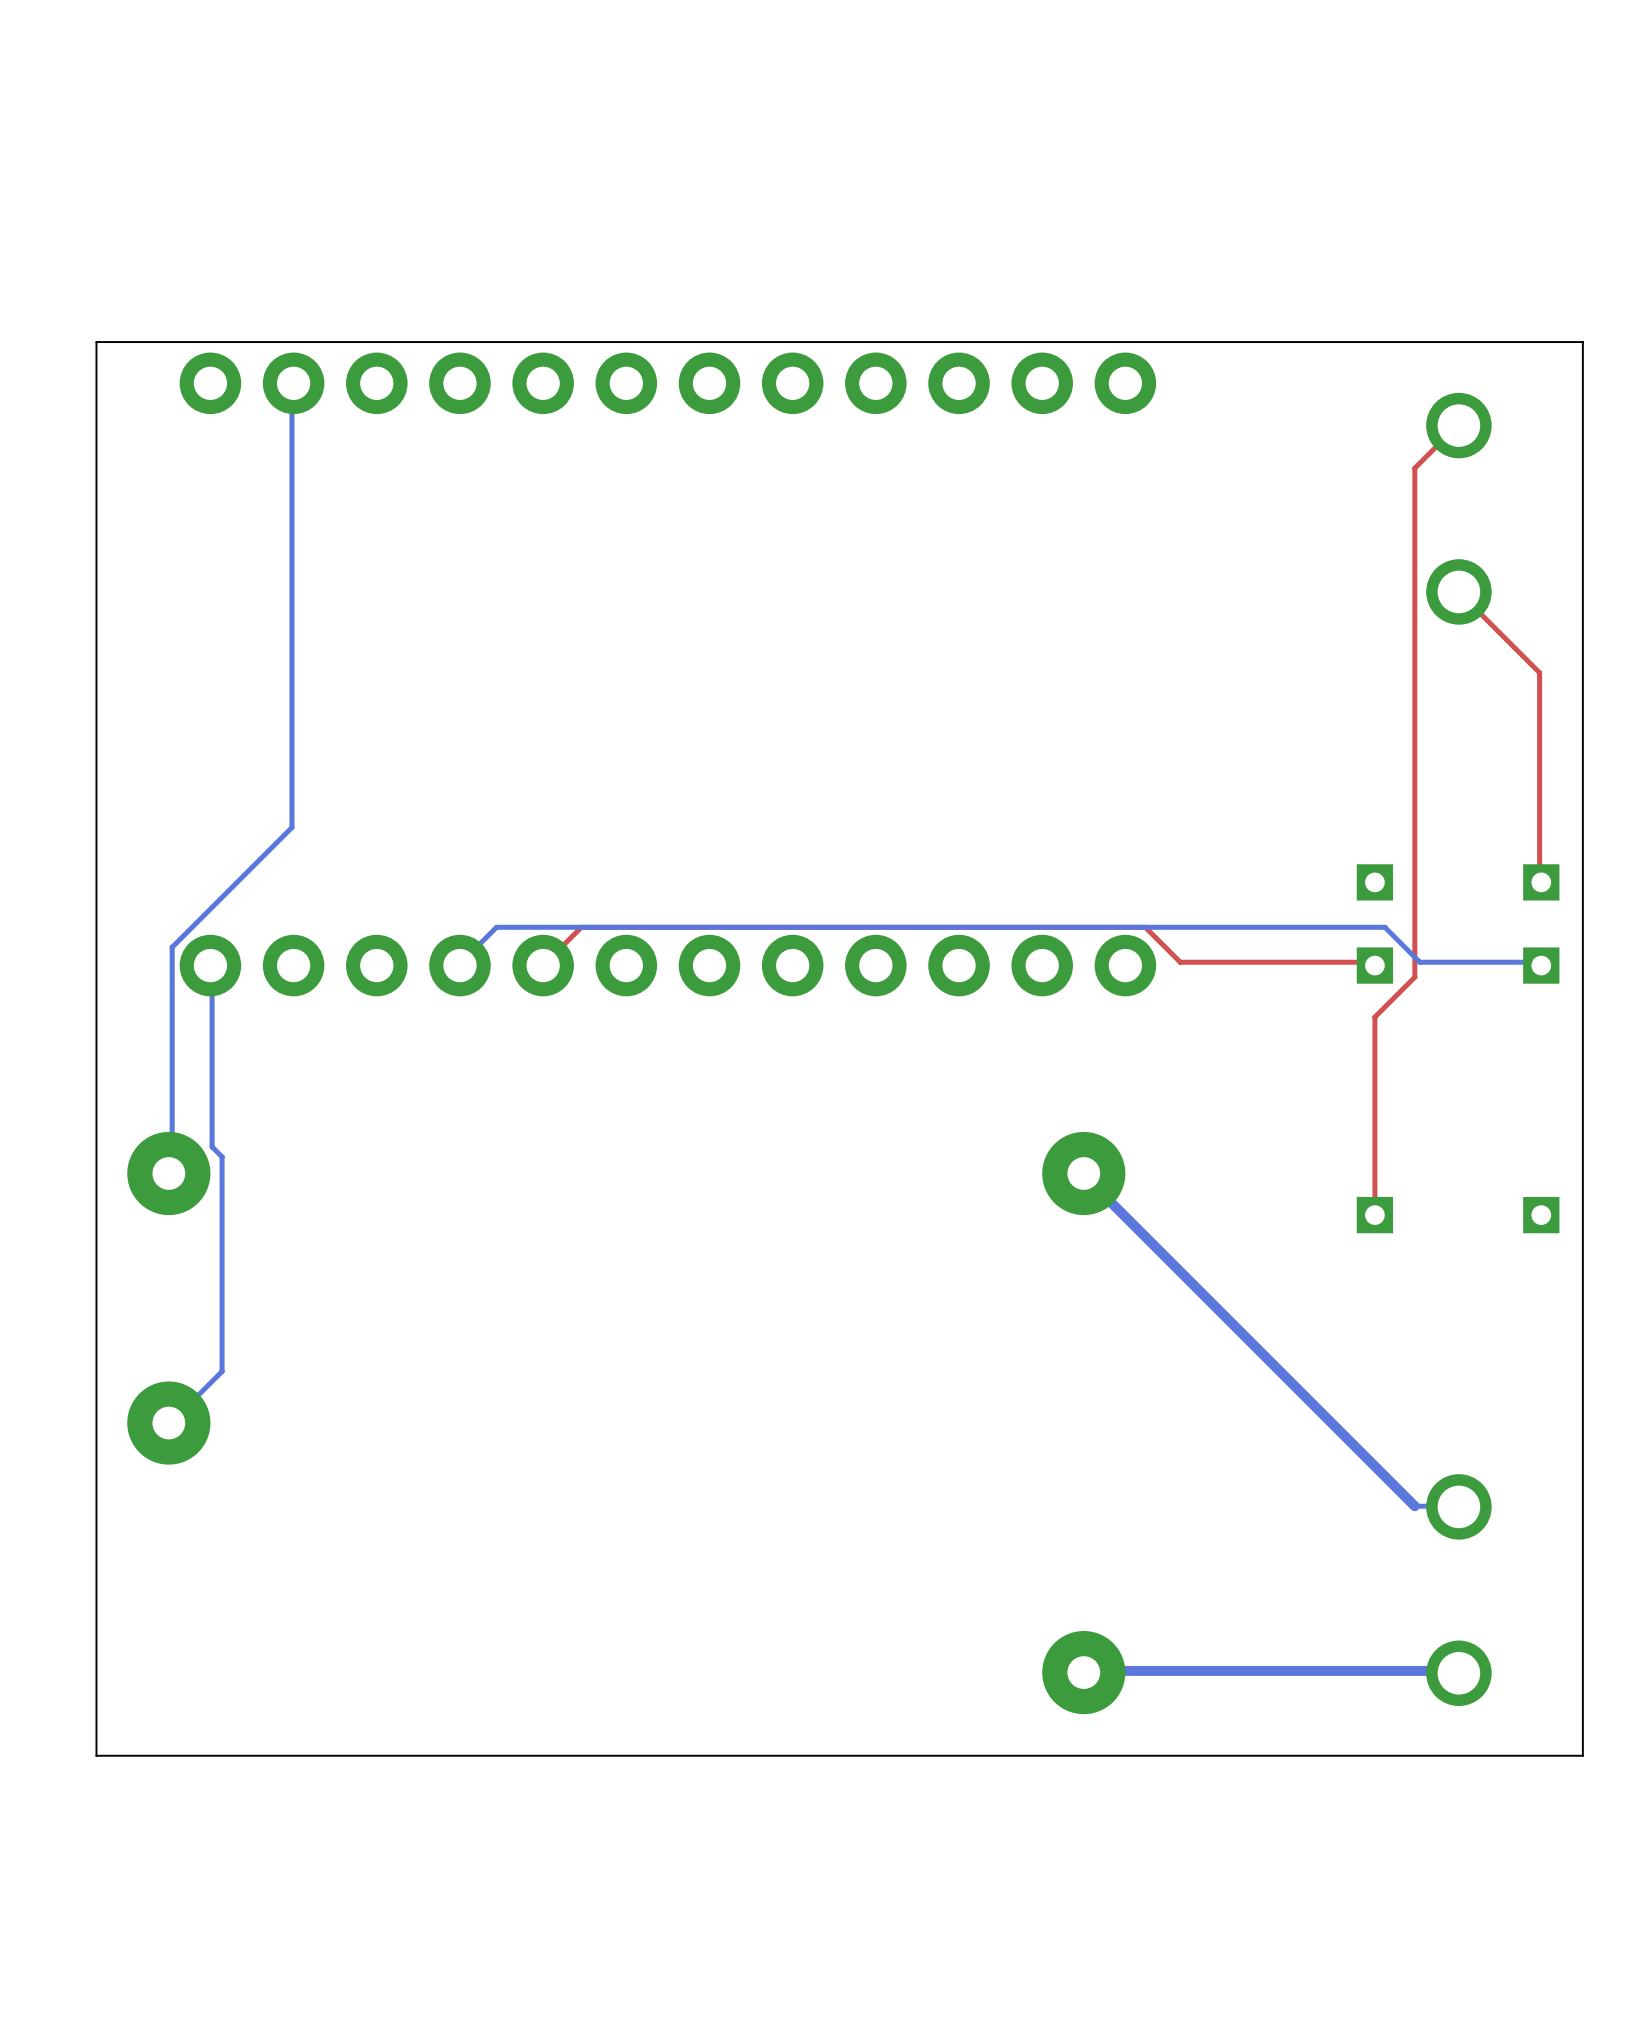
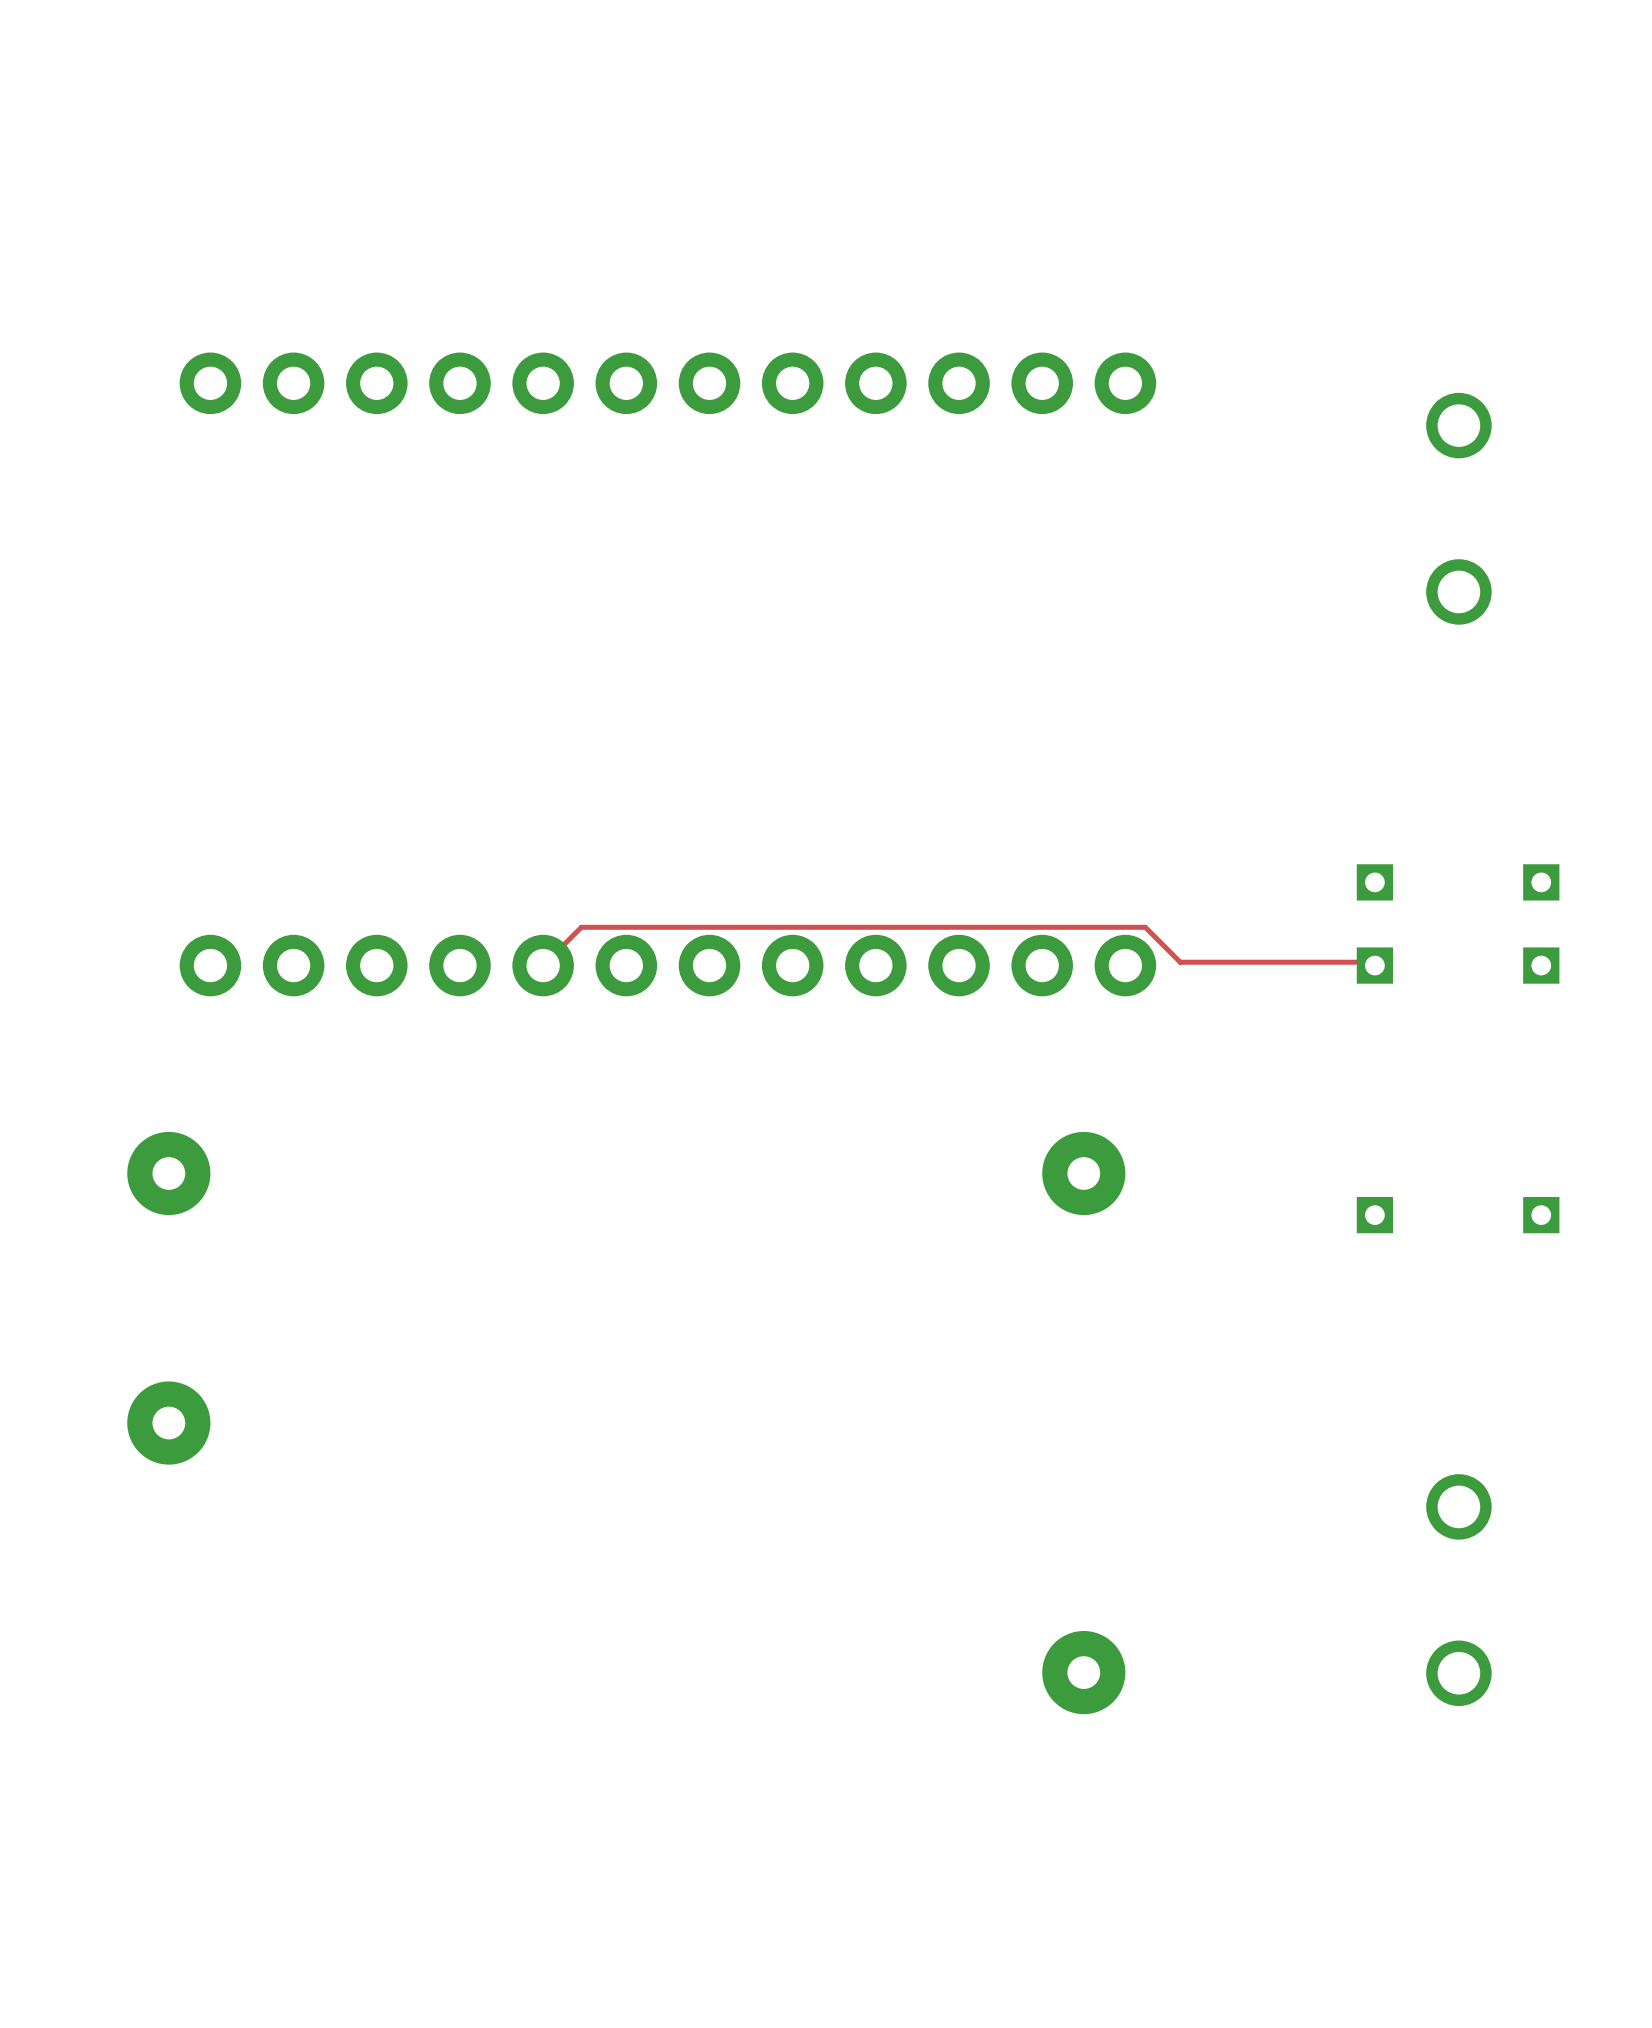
board edge: (1582, 342) (96, 342) (96, 1755) (1582, 1755) (1582, 342) -> none
bottom track: (293, 383) (291, 383) (291, 827) (172, 947) (172, 1171) (168, 1173) -> none
top track: (1458, 425) (1414, 468) (1414, 977) (1374, 1017) (1374, 1215) -> none
top track: (1458, 591) (1539, 672) (1539, 882) (1541, 882) -> none
bottom track: (210, 965) (212, 967) (212, 1146) (222, 1156) (222, 1371) (168, 1423) -> none
bottom track: (1541, 965) (1539, 962) (1419, 962) (1384, 927) (496, 927) (459, 965) -> none
bottom track: (1083, 1173) (1414, 1506) (1458, 1506) -> none
bottom track: (1083, 1672) (1085, 1670) (1454, 1670) (1458, 1673) -> none

